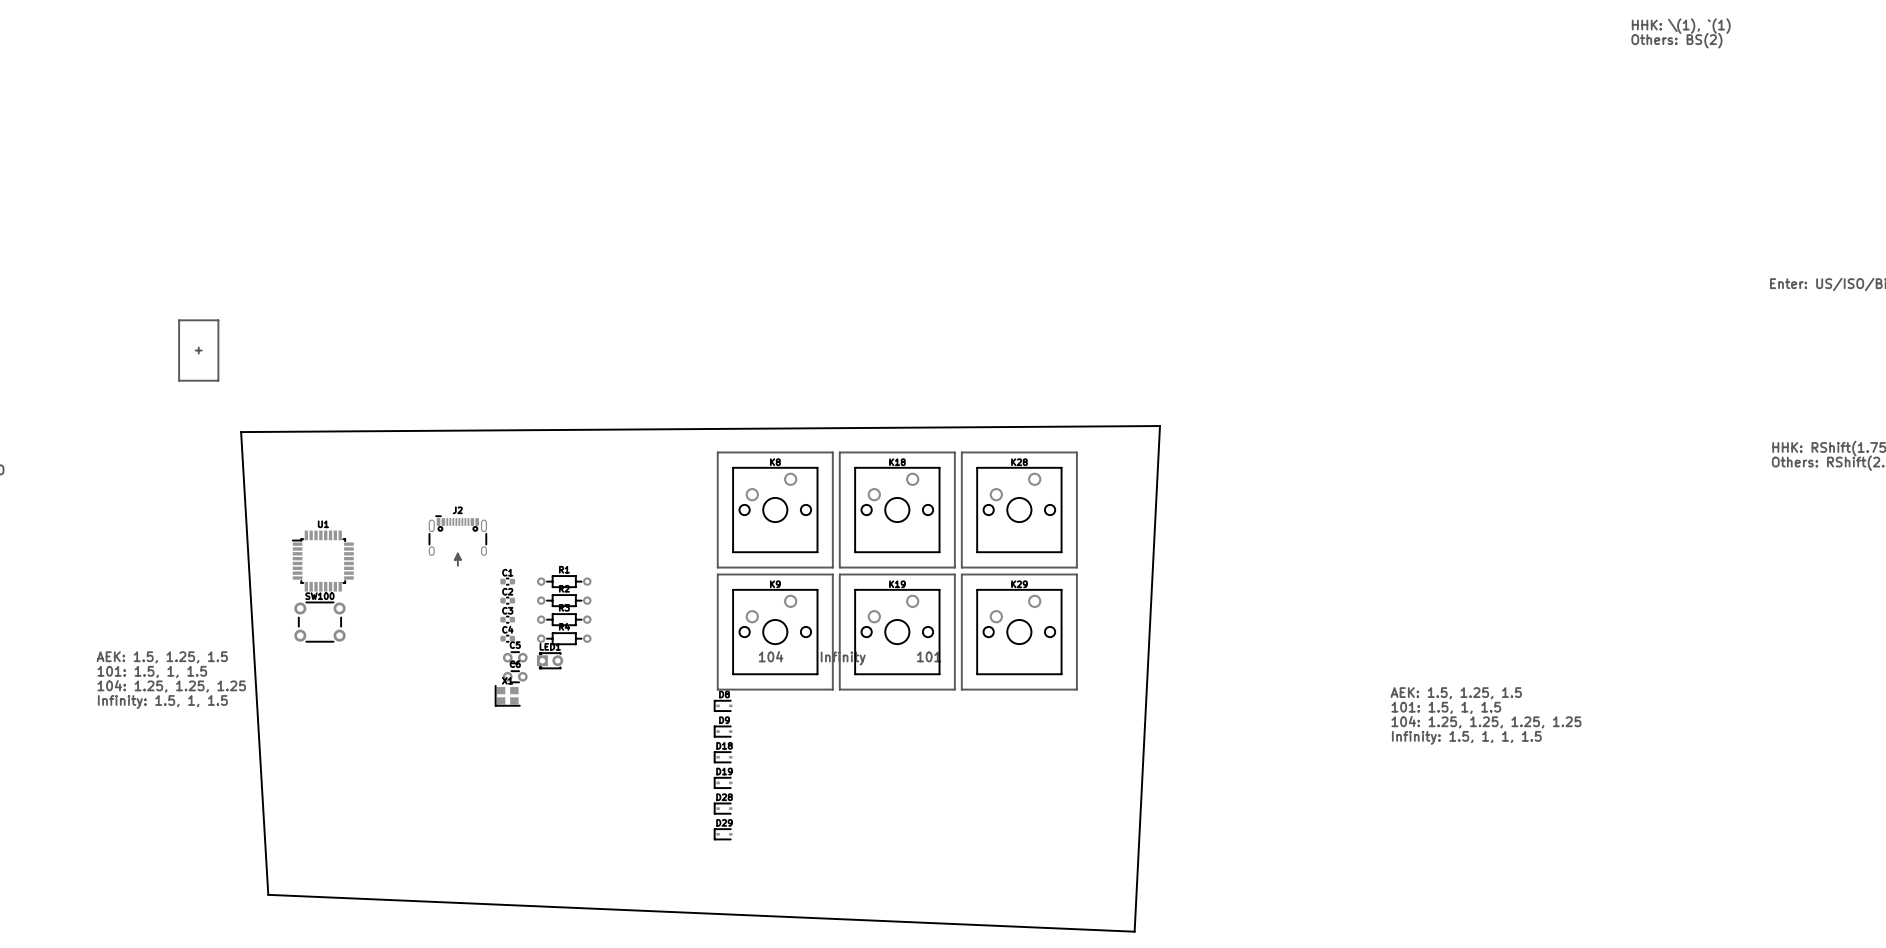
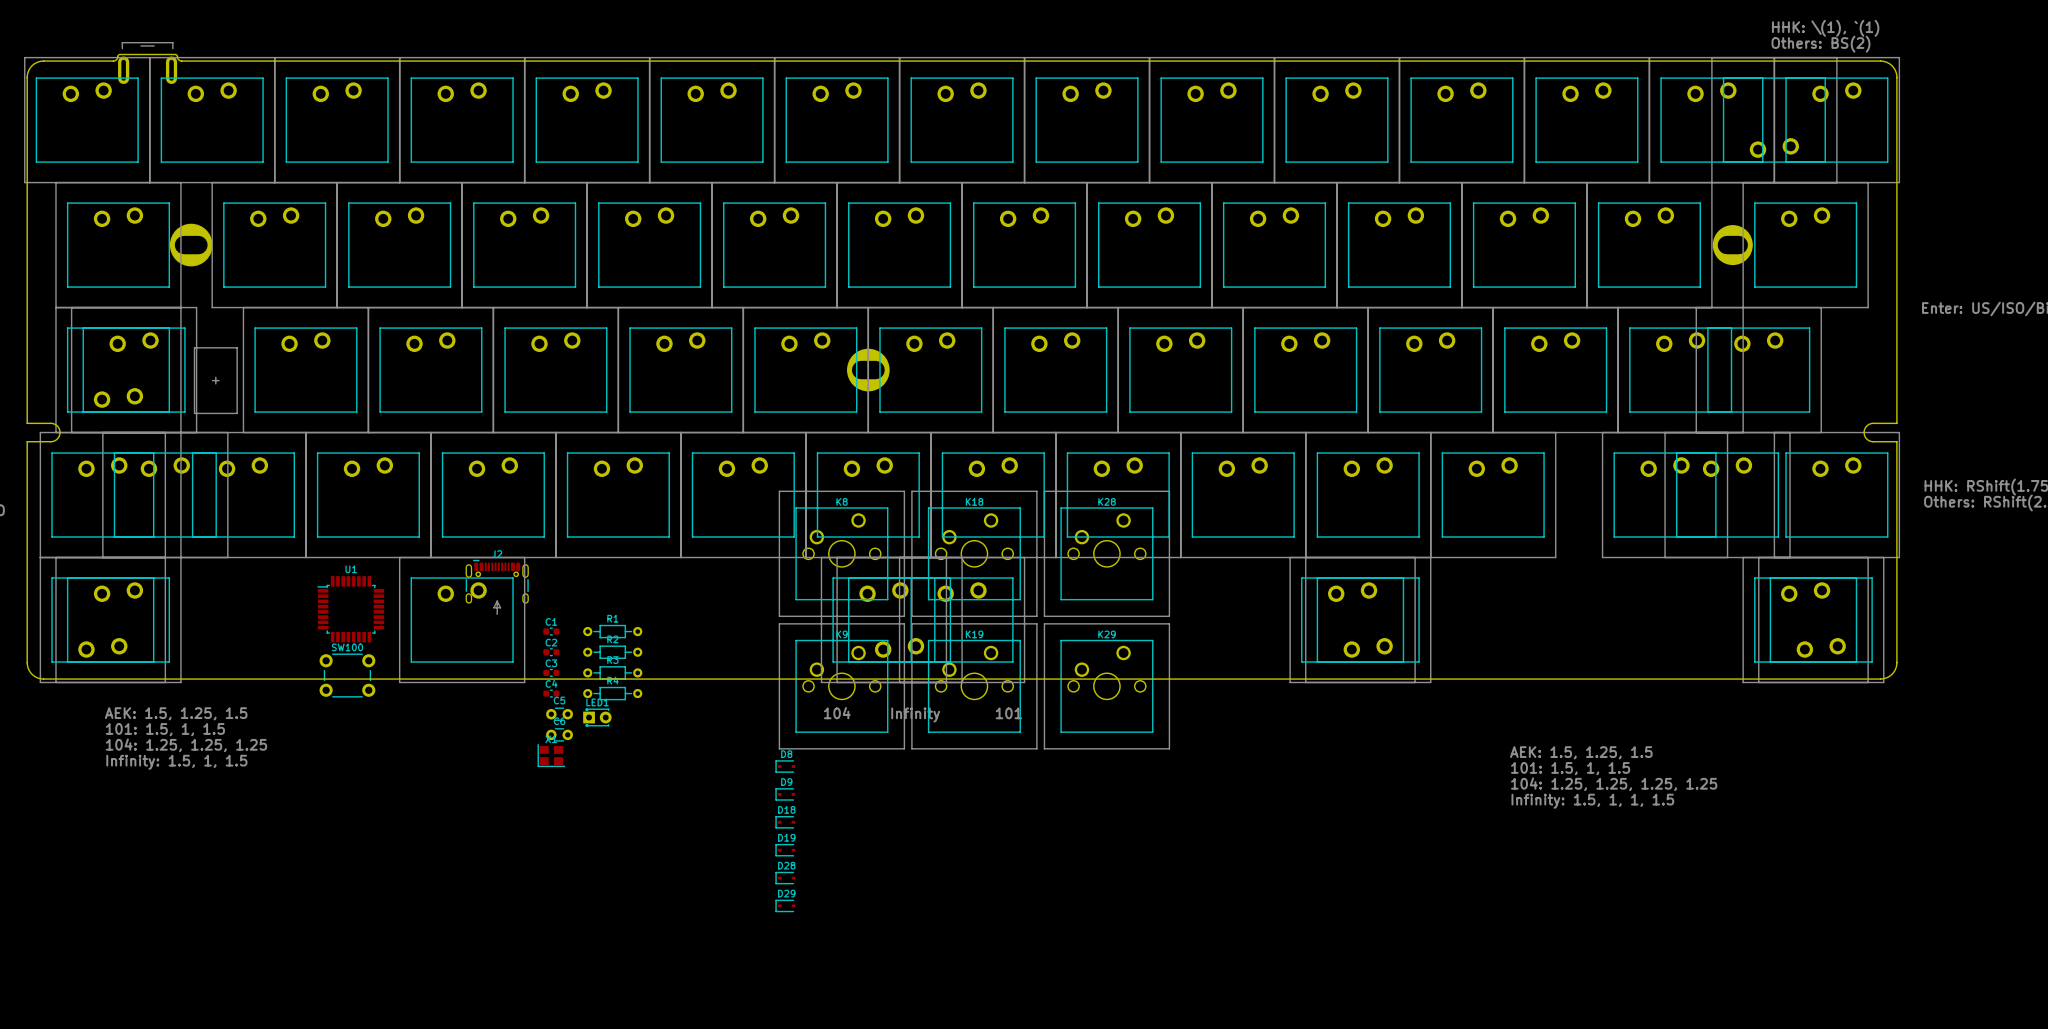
board edge: none -> (120, 54) (175, 54) (181, 61) (1885, 61) (1893, 67) (1896, 77) (1896, 423) (1871, 423) (1865, 427) (1864, 432) (1865, 437) (1871, 441) (1896, 441) (1895, 668) (1889, 676) (1880, 679) (38, 678) (29, 671) (27, 662) (27, 441) (53, 441) (58, 438) (60, 432) (58, 426) (53, 423) (27, 423) (27, 75) (30, 67) (39, 61) (114, 61) (120, 54)
part: none -> (147, 63)
part: none -> (87, 120)
part: none -> (212, 120)
part: none -> (337, 120)
part: none -> (462, 120)
part: none -> (587, 120)
part: none -> (712, 120)
part: none -> (837, 120)
part: none -> (962, 120)
part: none -> (1087, 120)
part: none -> (1212, 120)
part: none -> (1336, 120)
part: none -> (1461, 120)
part: none -> (1586, 120)
part: none -> (1711, 120)
part: none -> (1774, 120)
part: none -> (1836, 120)
part: none -> (118, 245)
part: none -> (191, 245)
part: none -> (274, 245)
part: none -> (399, 245)
part: none -> (524, 245)
part: none -> (649, 245)
part: none -> (774, 245)
part: none -> (899, 245)
part: none -> (1024, 245)
part: none -> (1149, 245)
part: none -> (1274, 245)
part: none -> (1399, 245)
part: none -> (1524, 245)
part: none -> (1649, 245)
part: none -> (1732, 245)
part: none -> (1805, 245)
part: none -> (118, 370)
part: none -> (134, 370)
part: none -> (305, 370)
part: none -> (430, 370)
part: none -> (555, 370)
part: none -> (680, 370)
part: none -> (805, 370)
part: none -> (868, 370)
part: none -> (930, 370)
part: none -> (1055, 370)
part: none -> (1180, 370)
part: none -> (1305, 370)
part: none -> (1430, 370)
part: none -> (1555, 370)
part: none -> (1680, 370)
part: none -> (1758, 370)
board edge: (1160, 426) (241, 432) (268, 894) (1134, 931) (1160, 426) -> none
part: none -> (102, 495)
part: none -> (165, 495)
part: none -> (243, 495)
part: none -> (368, 495)
part: none -> (493, 495)
part: none -> (618, 495)
part: none -> (743, 495)
part: none -> (868, 495)
part: none -> (993, 495)
part: none -> (1118, 495)
part: none -> (1243, 495)
part: none -> (1368, 495)
part: none -> (1493, 495)
part: none -> (1665, 495)
part: none -> (1727, 495)
part: none -> (1836, 495)
part: none -> (102, 620)
part: none -> (118, 620)
part: none -> (462, 620)
part: none -> (883, 620)
part: none -> (899, 620)
part: none -> (962, 620)
part: none -> (1352, 620)
part: none -> (1368, 620)
part: none -> (1805, 620)
part: none -> (1821, 620)

